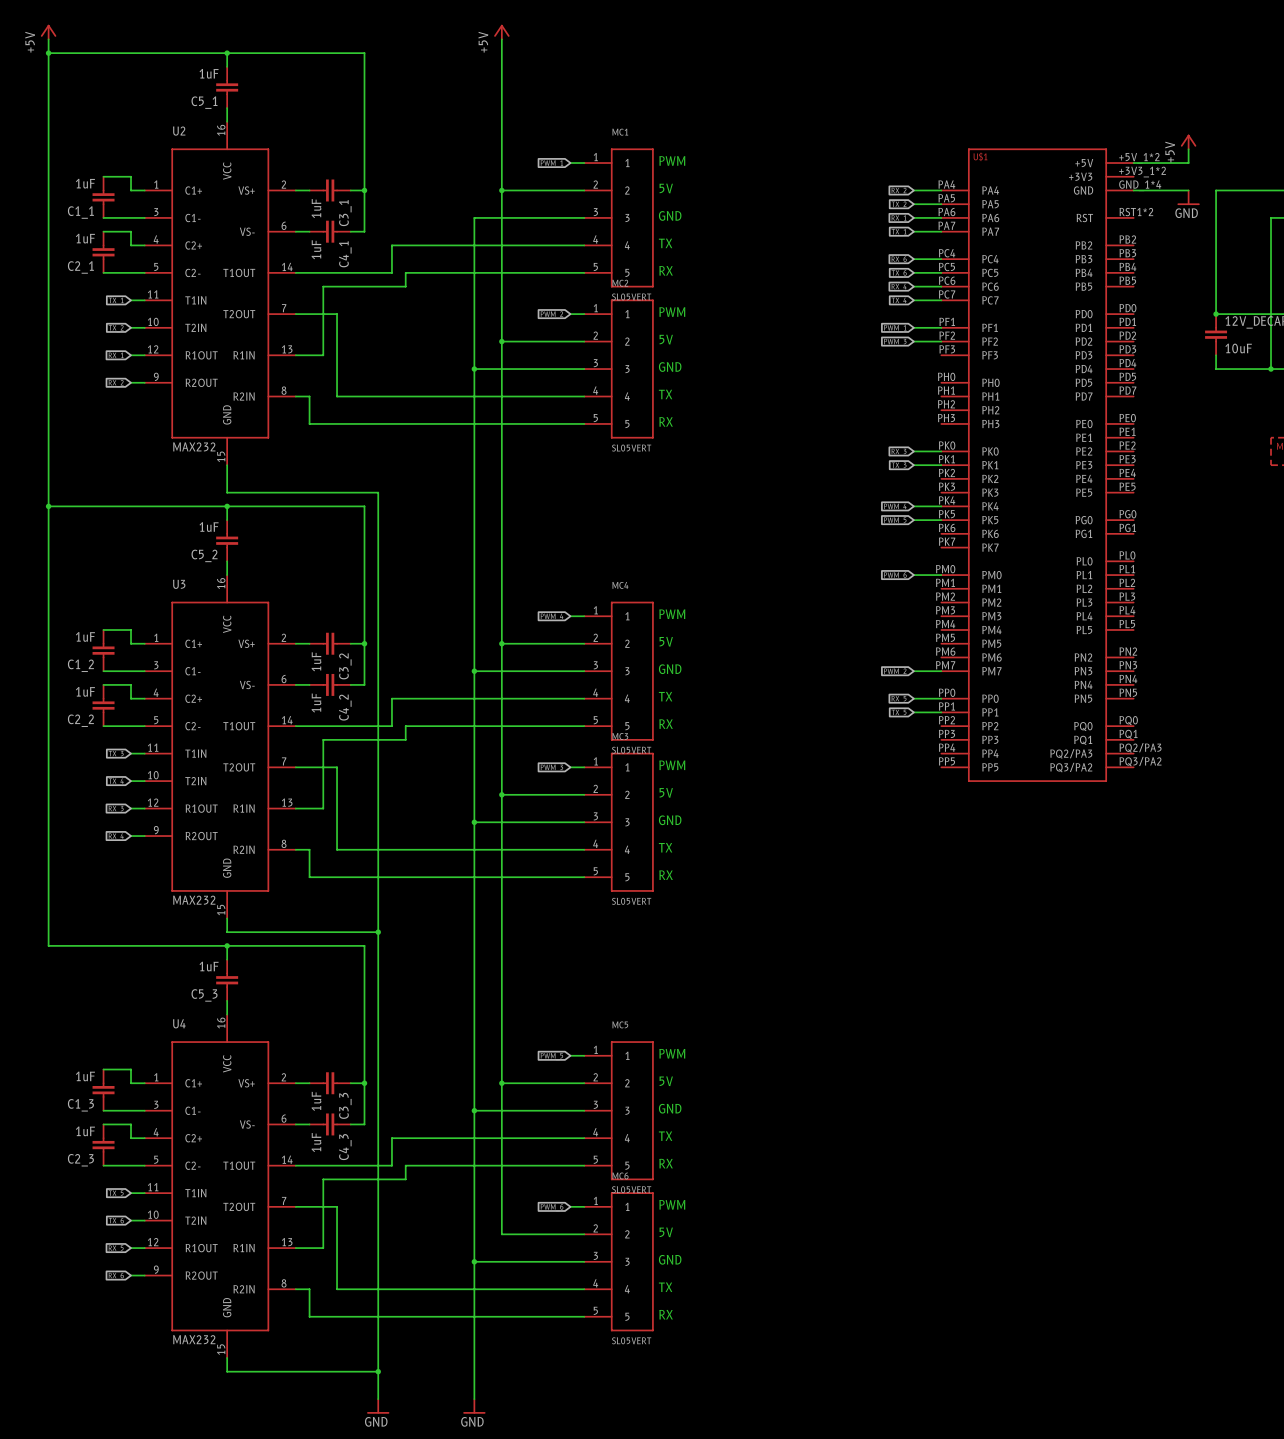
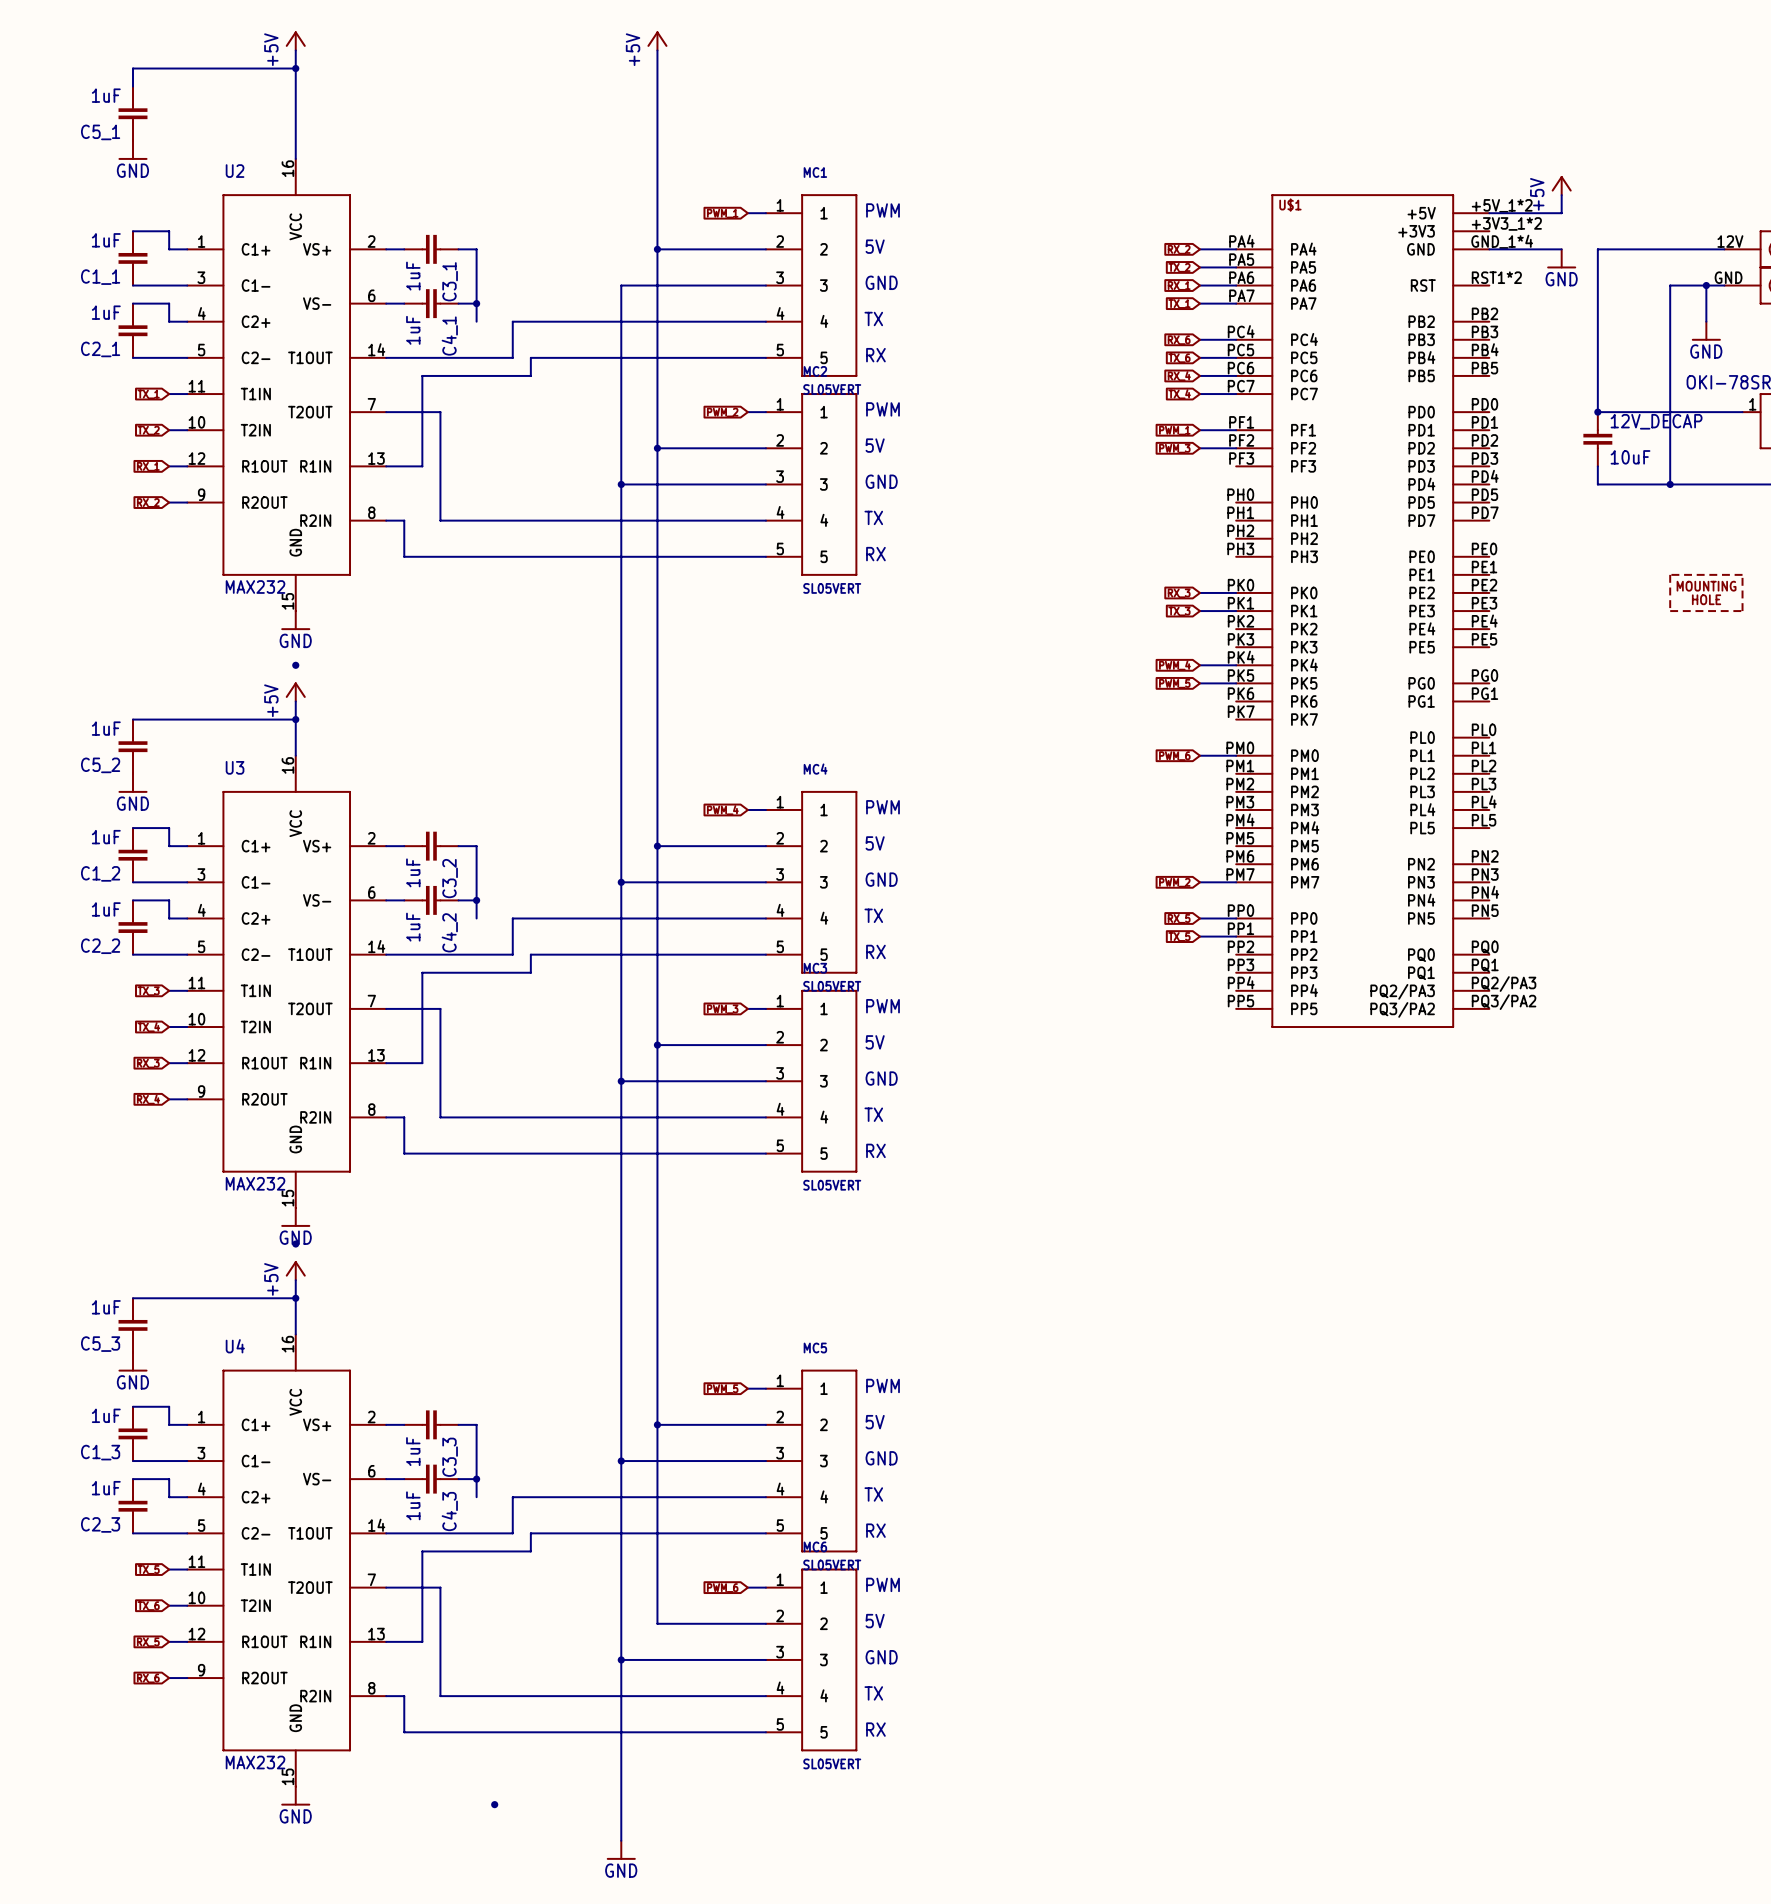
power symbol: +5V (48, 32) -> none
power symbol: none -> +5V (295, 40)
wire: (48, 39) (48, 945) (364, 945) (364, 1083) -> none
wire: (48, 53) (103, 53) -> (133, 86) (133, 68)
junction: (48, 53) -> none
wire: (227, 53) (364, 53) (364, 190) -> (295, 68) (295, 50)
C5_1 position: (227, 87) -> (133, 113)
power symbol: none -> GND (133, 150)
junction: (364, 190) -> none
wire: none -> (476, 303) (476, 321)
junction: none -> (476, 303)
wire: (227, 465) (227, 492) (378, 492) (378, 1399) -> none
power symbol: none -> GND (295, 620)
wire: (48, 506) (364, 506) (364, 643) -> none
junction: (48, 506) -> none
wire: (227, 506) (227, 520) -> none
power symbol: none -> +5V (295, 691)
C5_2 position: (227, 540) -> (133, 746)
wire: none -> (133, 719) (295, 719)
junction: none -> (295, 719)
power symbol: none -> GND (133, 783)
junction: (364, 643) -> none
wire: none -> (476, 900) (476, 918)
junction: none -> (476, 900)
wire: (227, 918) (227, 932) (378, 932) -> none
power symbol: none -> GND (295, 1217)
junction: (378, 932) -> none
wire: (227, 945) (227, 959) -> none
power symbol: none -> +5V (295, 1270)
C5_3 position: (227, 980) -> (133, 1325)
wire: none -> (133, 1298) (295, 1298)
junction: none -> (295, 1298)
power symbol: none -> GND (133, 1362)
junction: (364, 1083) -> none
wire: none -> (476, 1479) (476, 1497)
junction: none -> (476, 1479)
wire: (227, 1357) (227, 1371) (378, 1371) -> none
power symbol: none -> GND (295, 1796)
power symbol: GND (378, 1406) -> none

